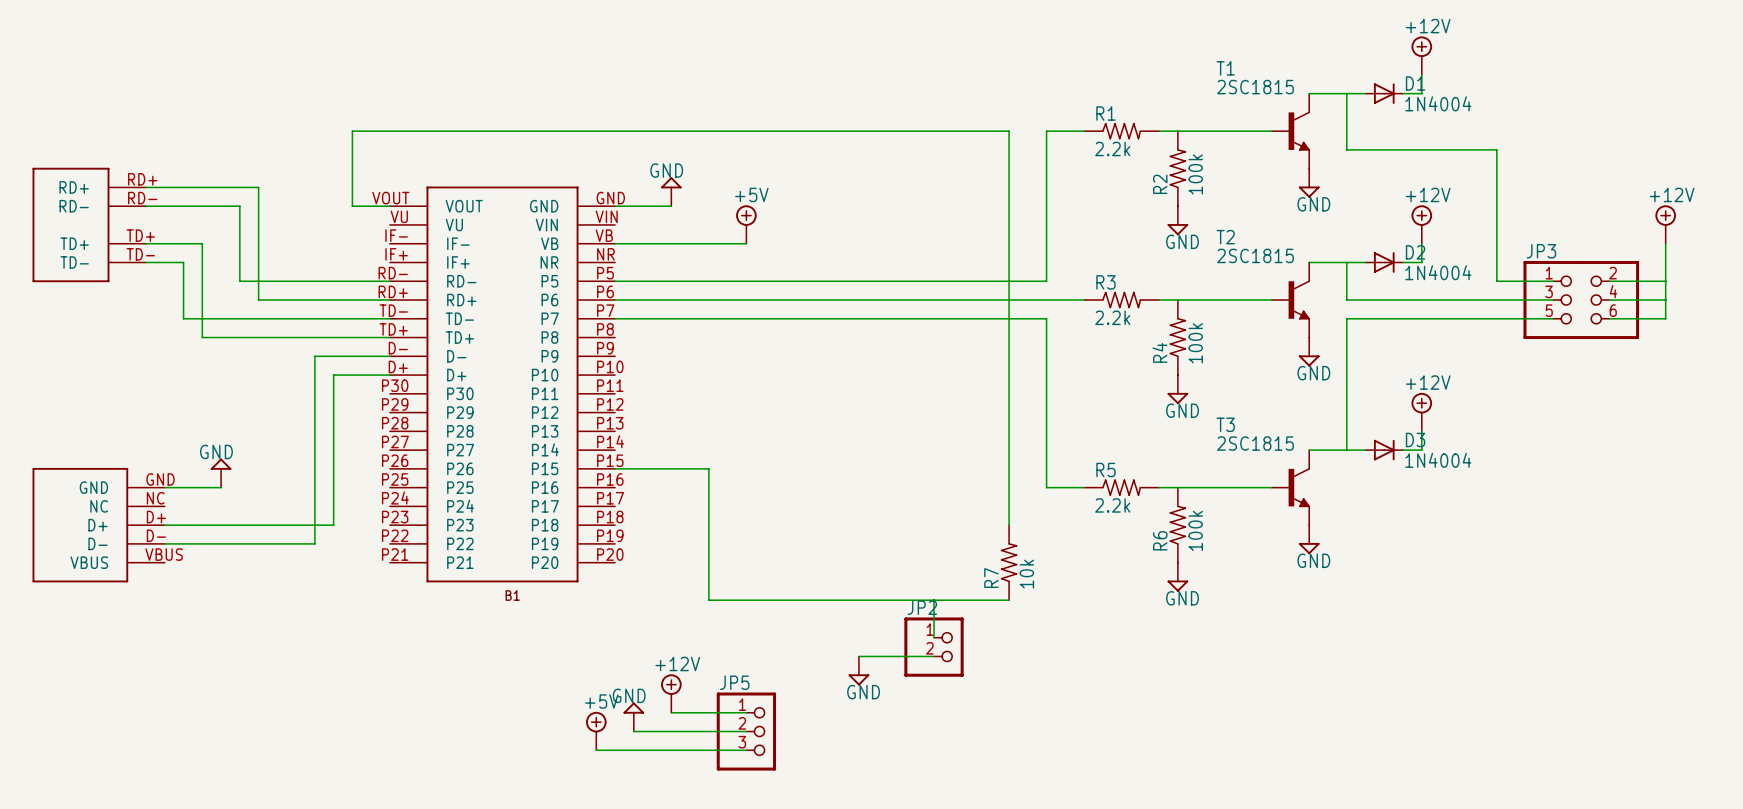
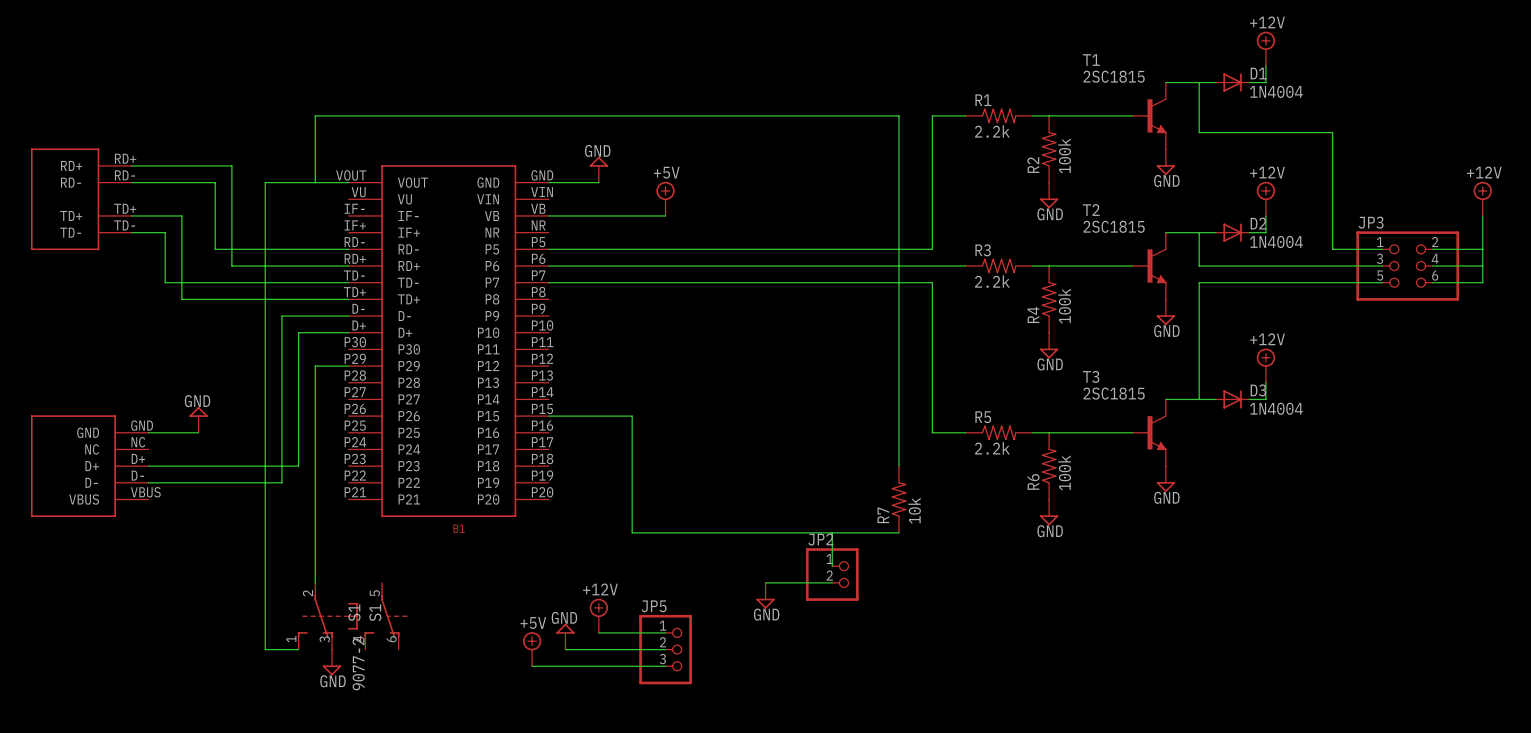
wire: none -> (315, 182) (265, 182) (265, 649) (298, 649)
wire: none -> (348, 366) (315, 366) (315, 582)
S1: none -> 9077-2 (327, 616)
S1: none -> (386, 616)
power symbol: none -> GND (331, 662)

